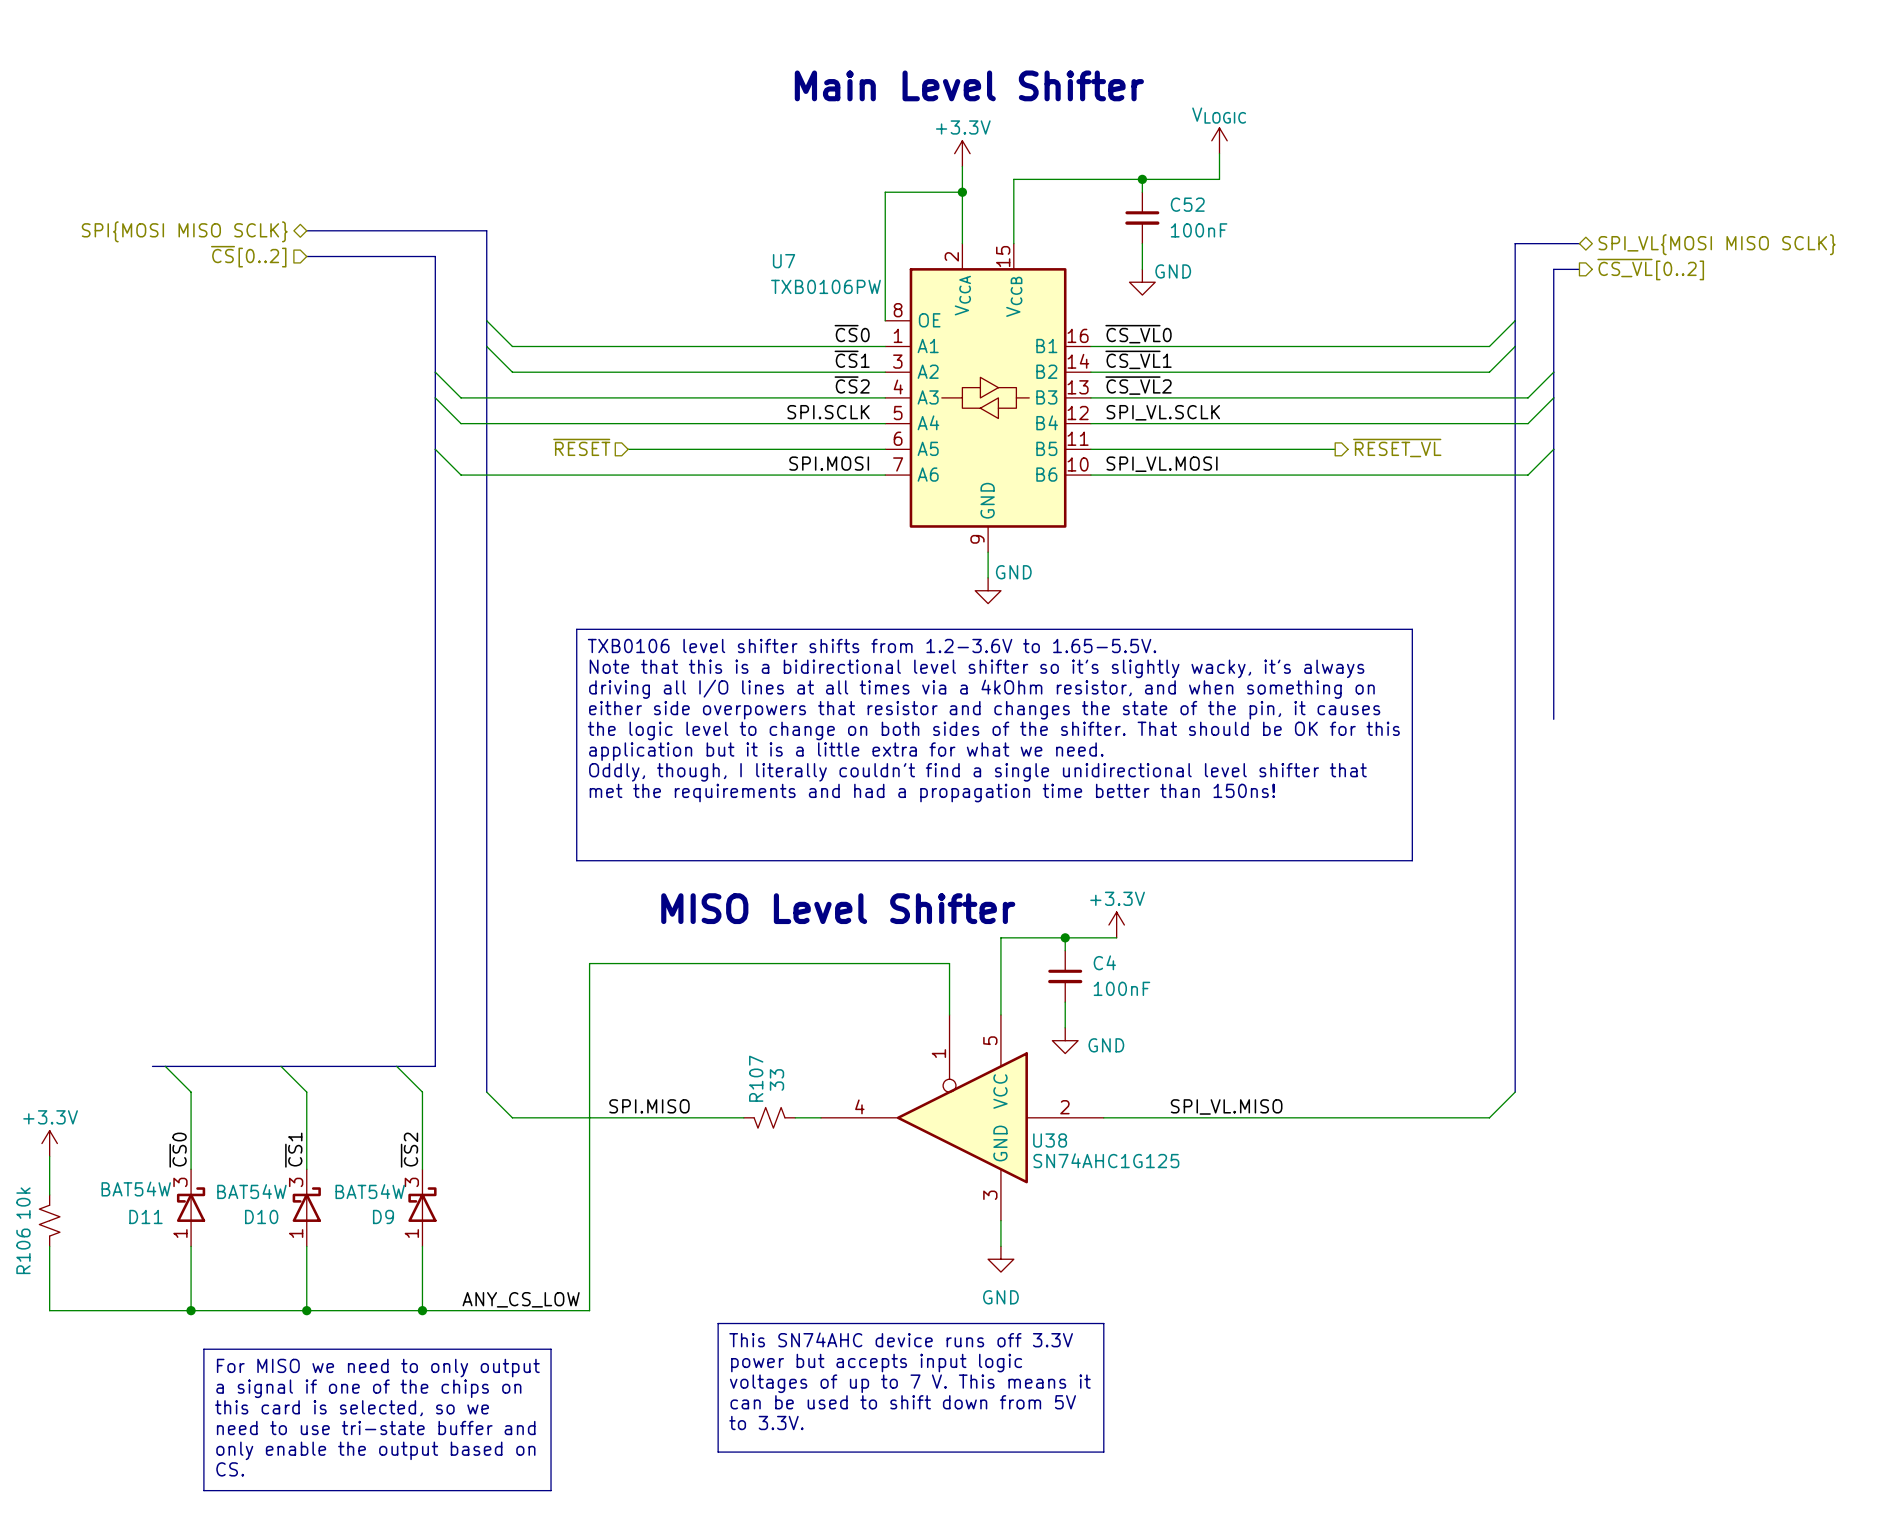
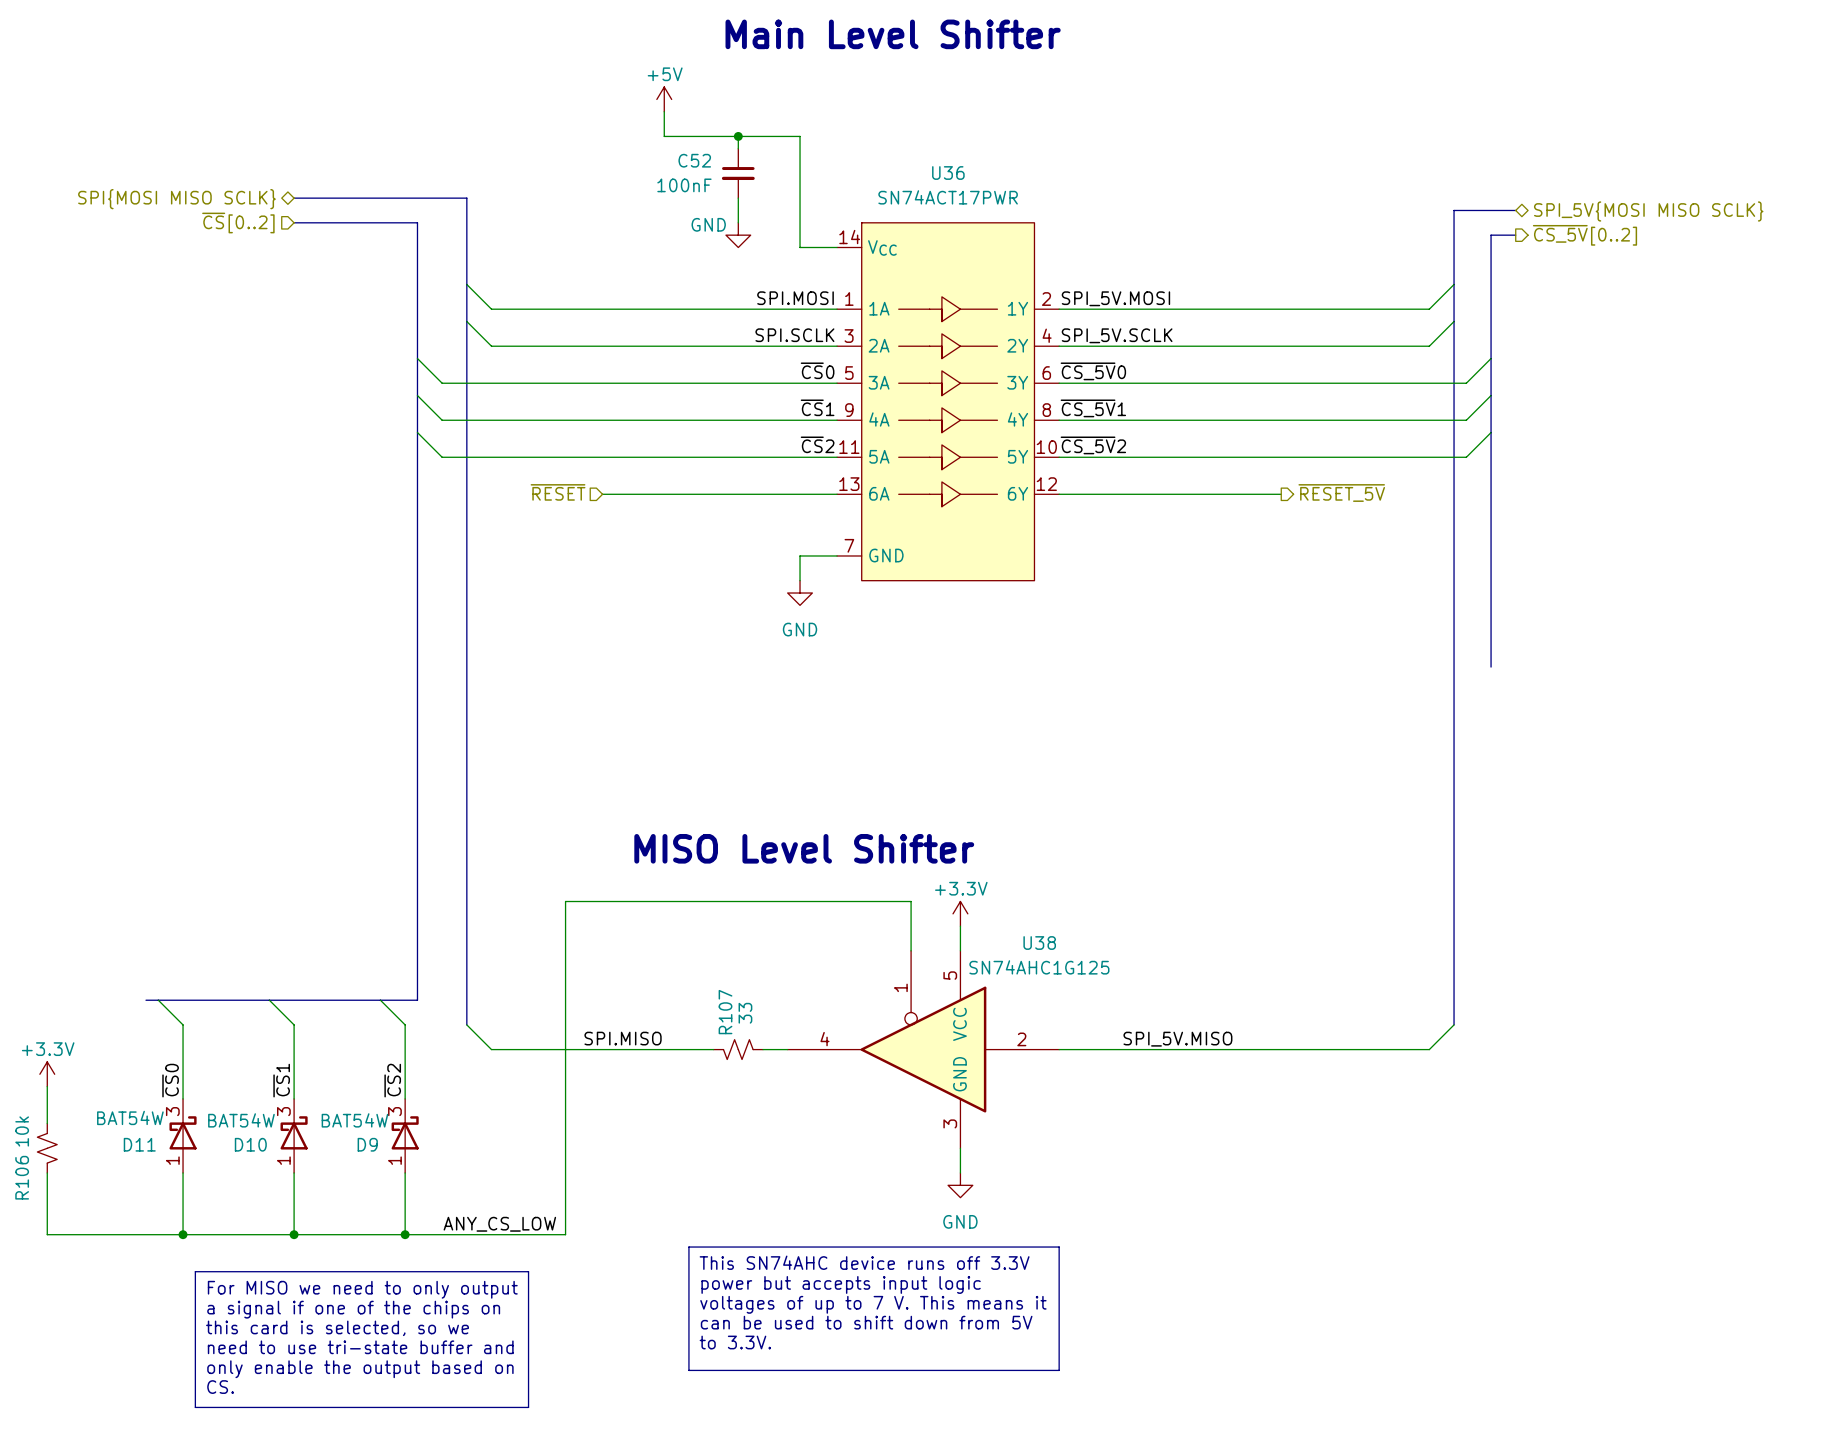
text position: Main Level Shifter (969, 85) -> Main Level Shifter (893, 34)
power symbol: none -> +5V (664, 99)
wire: none -> (664, 111) (664, 136) (800, 136) (800, 247) (837, 247)
power symbol: VLOGIC (1219, 140) -> none
power symbol: +3.3V (962, 153) -> none
wire: (1219, 153) (1219, 179) (1013, 179) (1013, 243) -> none
wire: none -> (738, 136) (738, 148)
junction: none -> (738, 136)
wire: (962, 166) (962, 243) -> none
wire: (1142, 179) (1142, 192) -> none
junction: (1142, 179) -> none
wire: (962, 192) (885, 192) (885, 320) -> none
junction: (962, 192) -> none
C52 name position: C52 (1187, 204) -> C52 (694, 160)
C52 position: (1142, 217) -> (738, 173)
wire: none -> (738, 198) (738, 222)
C52 value position: 100nF (1199, 230) -> 100nF (684, 185)
wire: (1142, 243) (1142, 269) -> none
hierarchical label: SPI_VL{MOSI MISO SCLK} (1717, 244) -> SPI_5V{MOSI MISO SCLK} (1648, 211)
power symbol: none -> GND (738, 235)
hierarchical label: ~{CS_VL}[0..2] (1650, 269) -> ~{CS_5V}[0..2] (1584, 235)
power symbol: GND (1142, 282) -> none
label: ~{CS}0 (852, 333) -> SPI.MOSI (795, 298)
label: ~{CS_VL}0 (1138, 334) -> SPI_5V.MOSI (1115, 298)
wire: (486, 346) (512, 372) (885, 372) -> none
wire: (1515, 346) (1489, 372) (1090, 372) -> none
wire: none -> (466, 321) (491, 346) (837, 346)
label position: ~{CS}1 (852, 359) -> ~{CS}1 (817, 407)
label: ~{CS_VL}1 (1138, 359) -> none
wire: none -> (1454, 321) (1429, 346) (1059, 346)
wire: (435, 372) (461, 397) (885, 397) -> none
wire: (1553, 372) (1528, 397) (1090, 397) -> none
label: none -> SPI.SCLK (794, 335)
label: none -> SPI_5V.SCLK (1117, 335)
label position: ~{CS}2 (852, 384) -> ~{CS}2 (817, 444)
label: ~{CS_VL}2 (1138, 385) -> none
U7: TXB0106PW (988, 397) -> none
label: SPI.SCLK (828, 412) -> ~{CS}0 (817, 370)
label: SPI_VL.SCLK (1163, 412) -> ~{CS_5V}0 (1093, 371)
wire: none -> (417, 395) (442, 420) (837, 420)
wire: none -> (1491, 395) (1466, 420) (1059, 420)
U36: none -> SN74ACT17PWR (948, 401)
hierarchical label position: ~{RESET} (581, 447) -> ~{RESET} (558, 492)
hierarchical label: ~{RESET_VL} (1397, 447) -> none
wire: (435, 449) (461, 475) (885, 475) -> none
wire: (628, 449) (885, 449) -> none
wire: (1090, 449) (1335, 449) -> none
label: none -> ~{CS_5V}1 (1093, 408)
wire: (1553, 449) (1528, 475) (1090, 475) -> none
label: SPI.MOSI (829, 463) -> none
label: SPI_VL.MOSI (1162, 464) -> none
wire: none -> (417, 432) (442, 457) (837, 457)
wire: none -> (1491, 432) (1466, 457) (1059, 457)
label: none -> ~{CS_5V}2 (1093, 445)
hierarchical label: none -> ~{RESET_5V} (1341, 493)
wire: none -> (602, 494) (837, 494)
wire: none -> (1059, 494) (1281, 494)
power symbol text position: GND (1013, 572) -> GND (800, 629)
power symbol position: GND (988, 590) -> GND (800, 593)
wire: none -> (837, 555) (800, 555) (800, 580)
line: (576, 629) (1412, 629) (1412, 860) (576, 860) (576, 629) -> none
text: TXB0106 level shifter shifts from 1.2-3.6V to 1.65-5.5V. (872, 646) -> none
text: Note that this is a bidirectional level shifter so it's slightly wacky, it's always (977, 668) -> none
text: driving all I/O lines at all times via a 4kOhm resistor, and when something on (981, 689) -> none
text: either side overpowers that resistor and changes the state of the pin, it causes (984, 710) -> none
text: the logic level to change on both sides of the shifter. That should be OK for this (993, 730) -> none
text: application but it is a little extra for what we need. (846, 751) -> none
text: Oddly, though, I literally couldn't find a single unidirectional level shifter that (977, 772) -> none
text: met the requirements and had a propagation time better than 150ns! (932, 793) -> none
power symbol position: +3.3V (1116, 924) -> +3.3V (960, 913)
wire: (1065, 937) (1065, 950) -> none
junction: (1065, 937) -> none
wire: (1116, 937) (1000, 937) (1000, 989) -> none
C4: 100nF (1065, 976) -> none
wire: (1065, 1002) (1065, 1027) -> none
power symbol: GND (1065, 1040) -> none
label: SPI_VL.MISO (1226, 1106) -> SPI_5V.MISO (1177, 1039)
U38 name position: U38 (1050, 1140) -> U38 (1039, 943)
U38 value position: SN74AHC1G125 (1106, 1160) -> SN74AHC1G125 (1039, 967)

